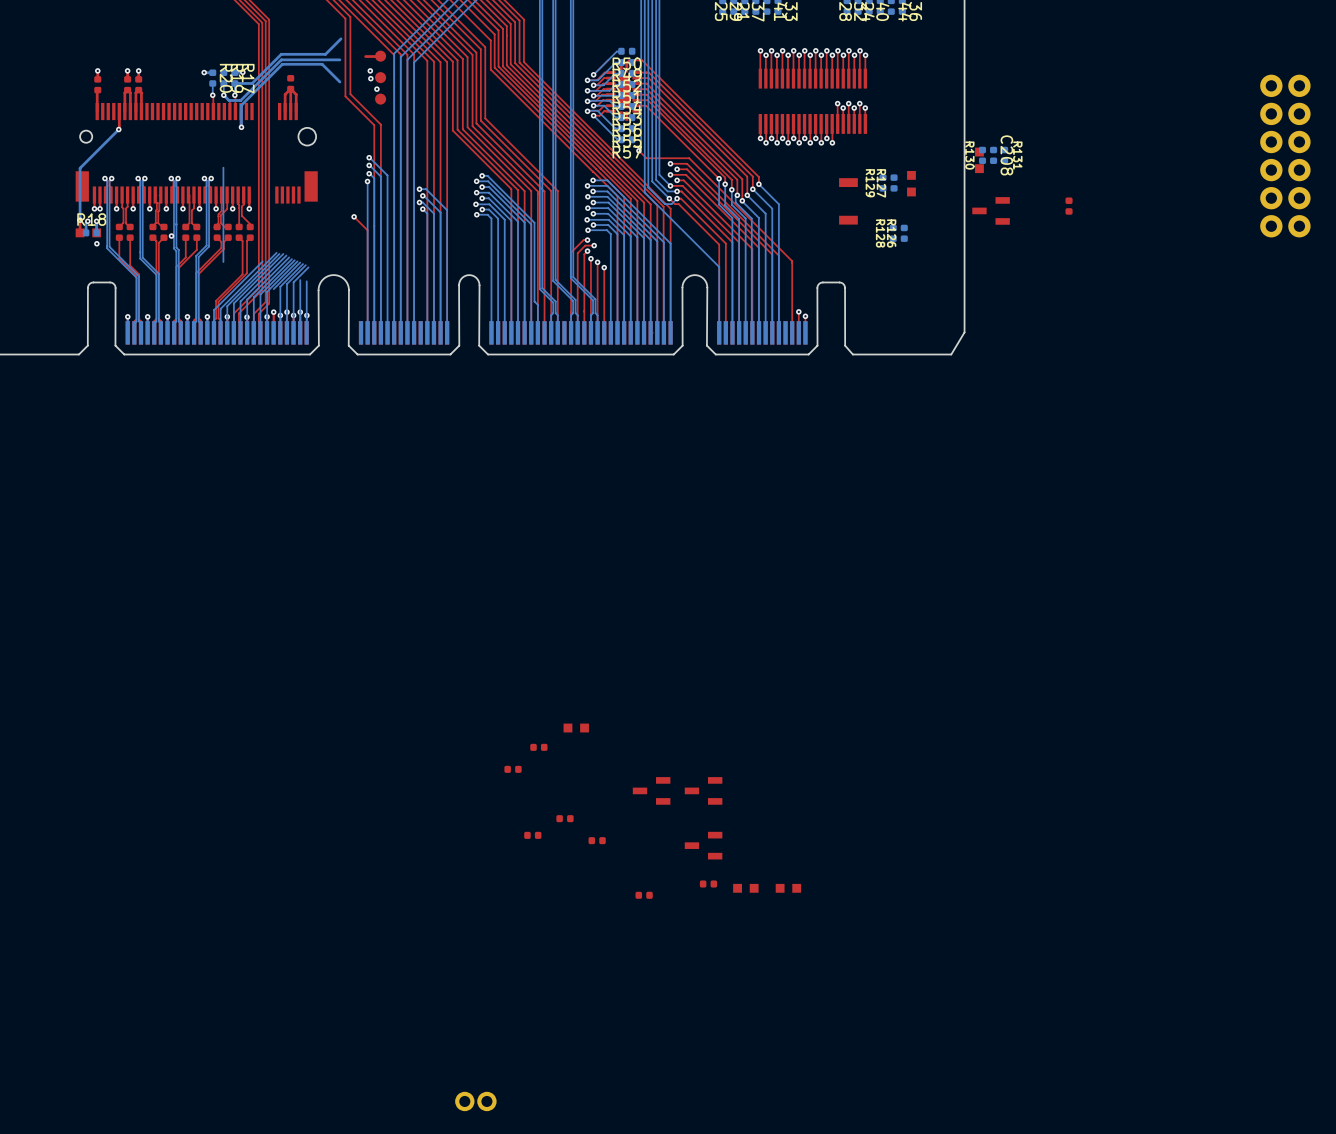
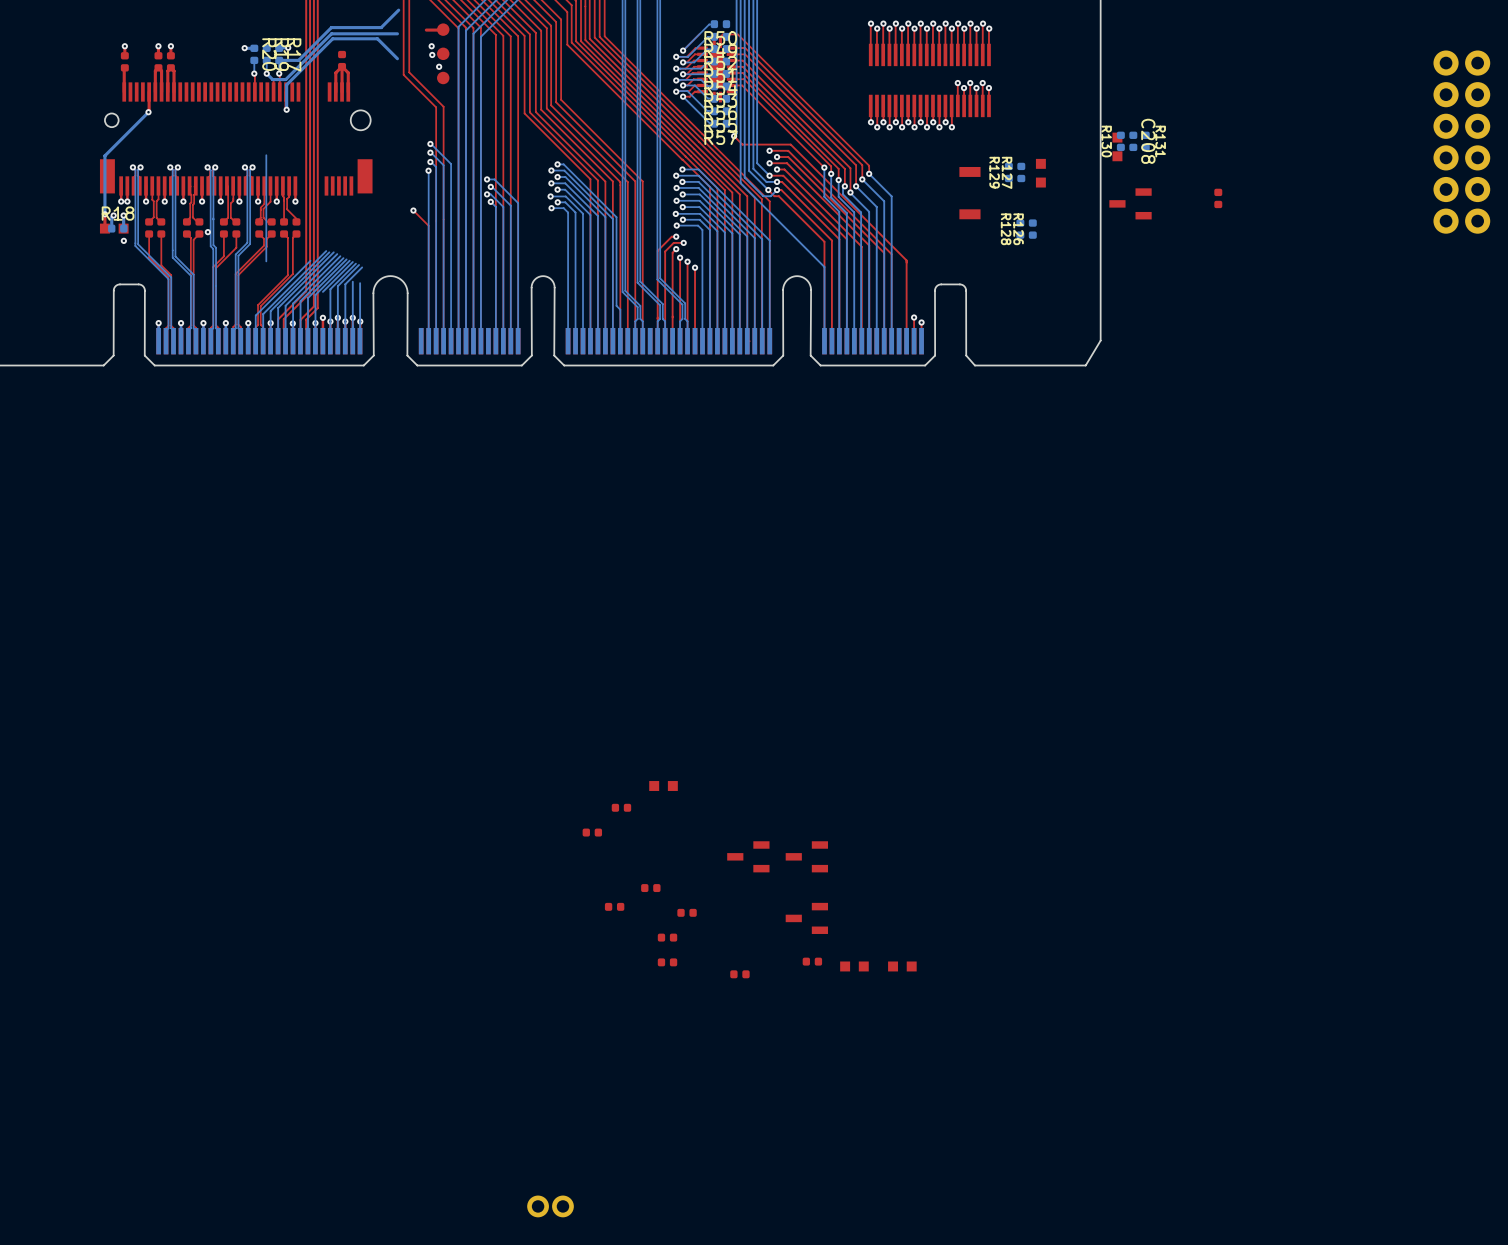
part: none -> (667, 937)
part: none -> (667, 962)

